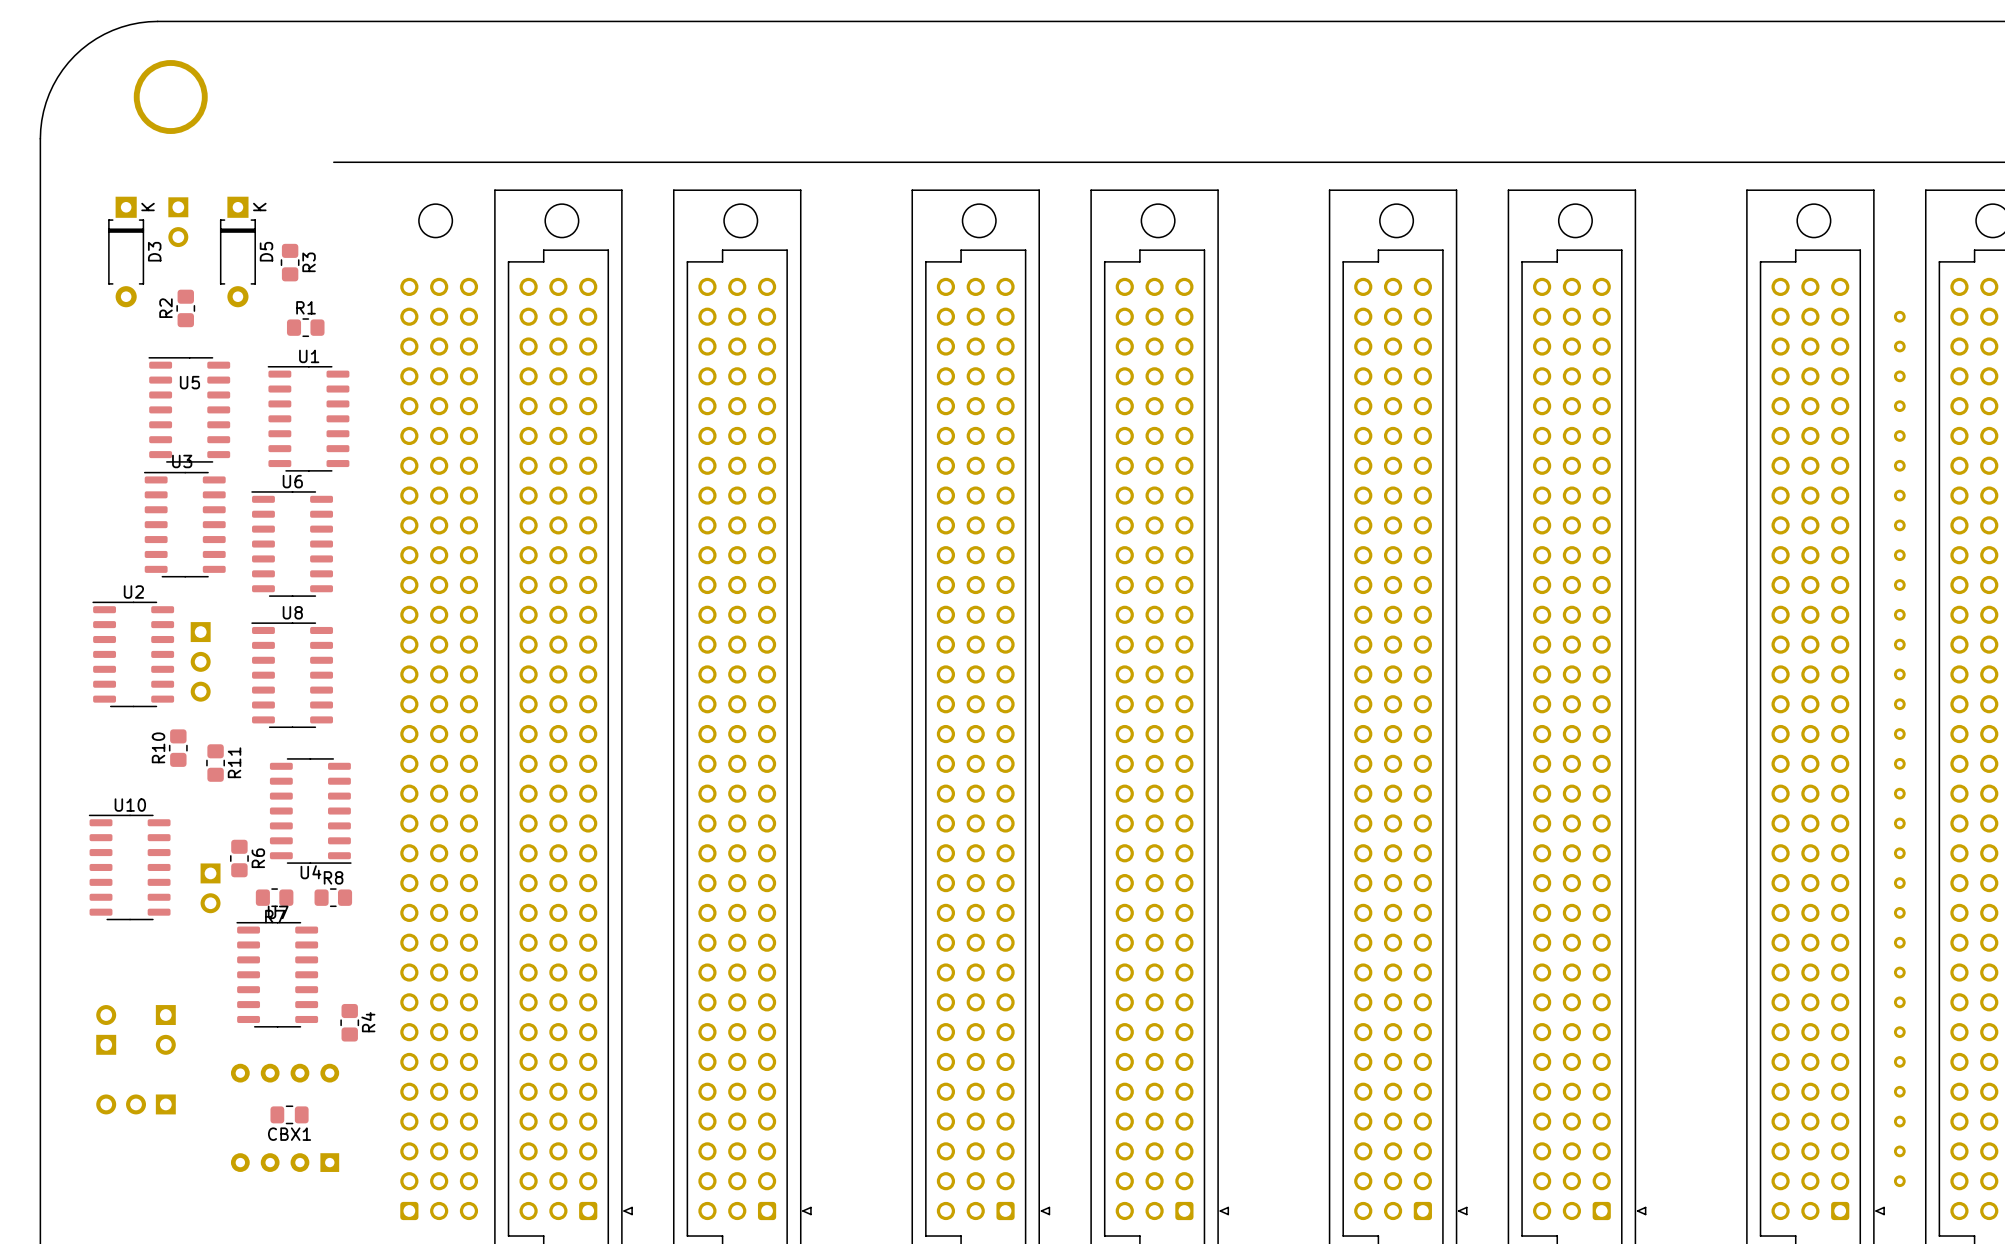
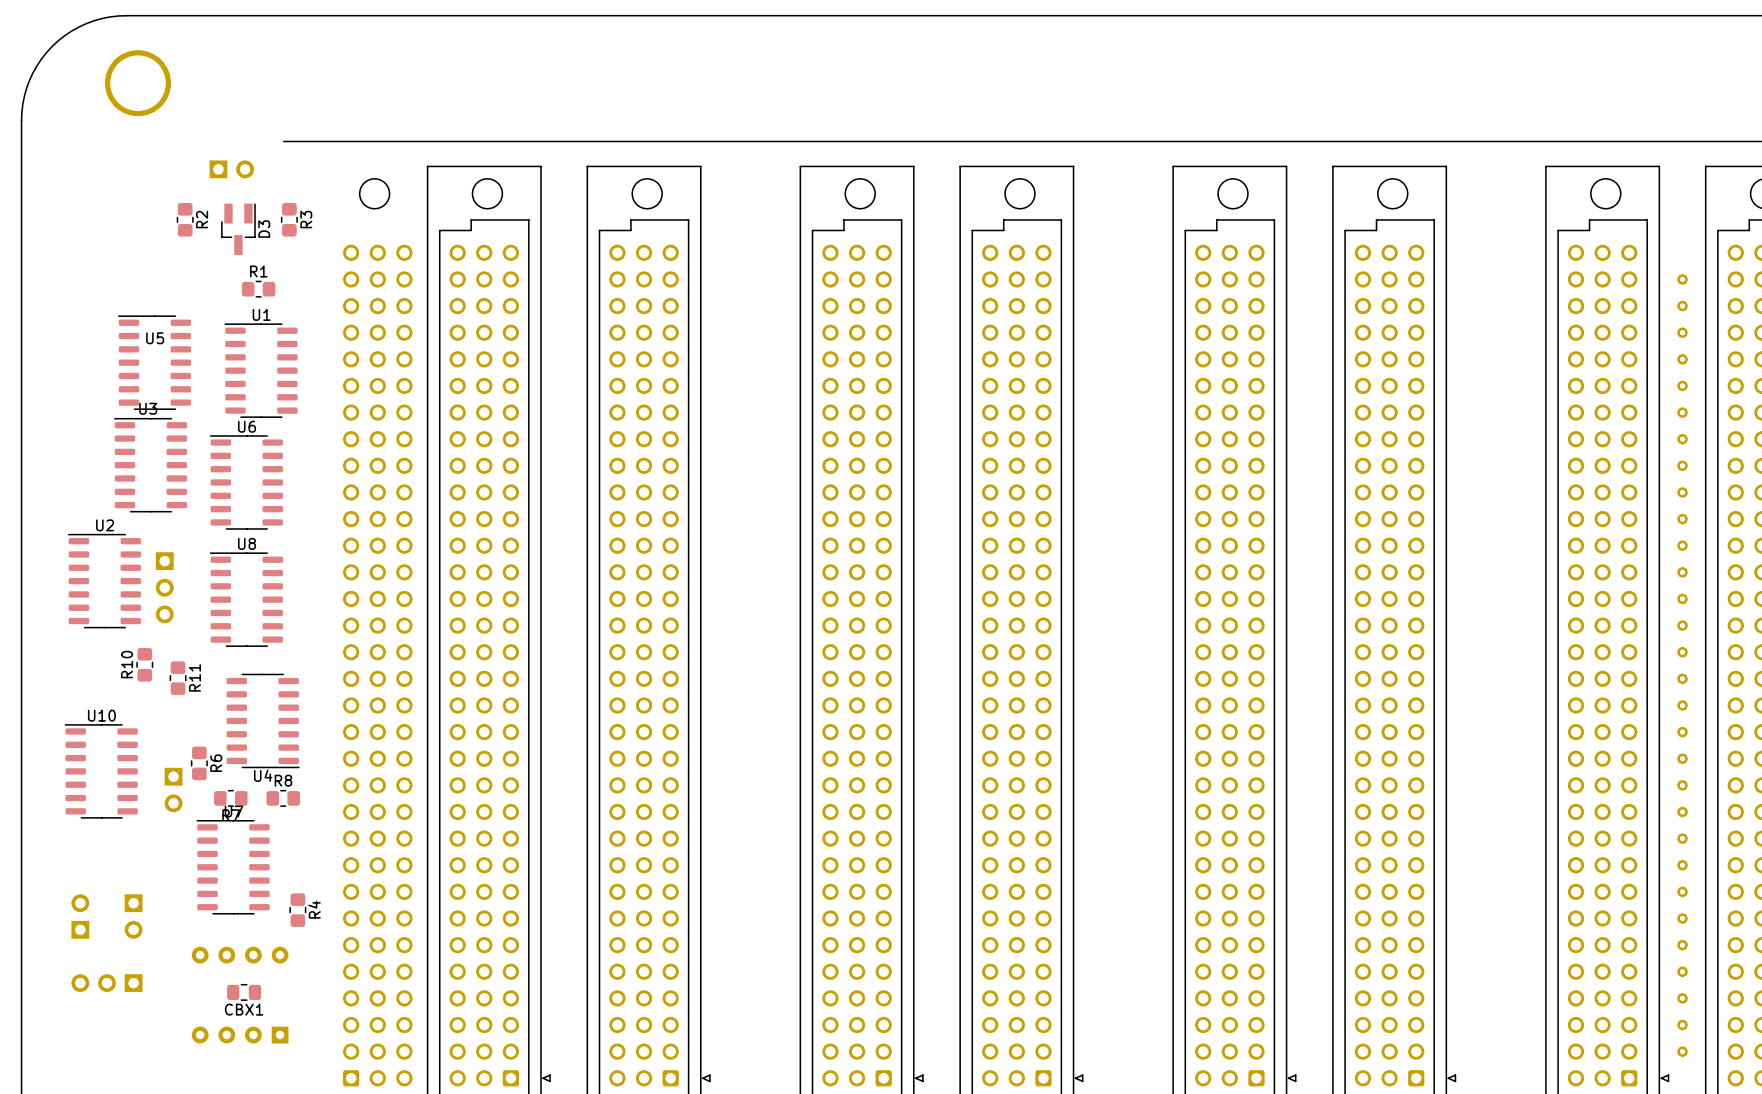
D3 footprint: [108, 196, 145, 308] -> [221, 203, 256, 255]
part rotation: 0° (178, 222) -> 90° counterclockwise (231, 169)
part position: (178, 222) -> (231, 169)
D5: (237, 251) -> none
R3 position: (290, 262) -> (289, 219)
R2 name position: R2 (165, 308) -> R2 (202, 219)
R2 position: (185, 308) -> (185, 219)

